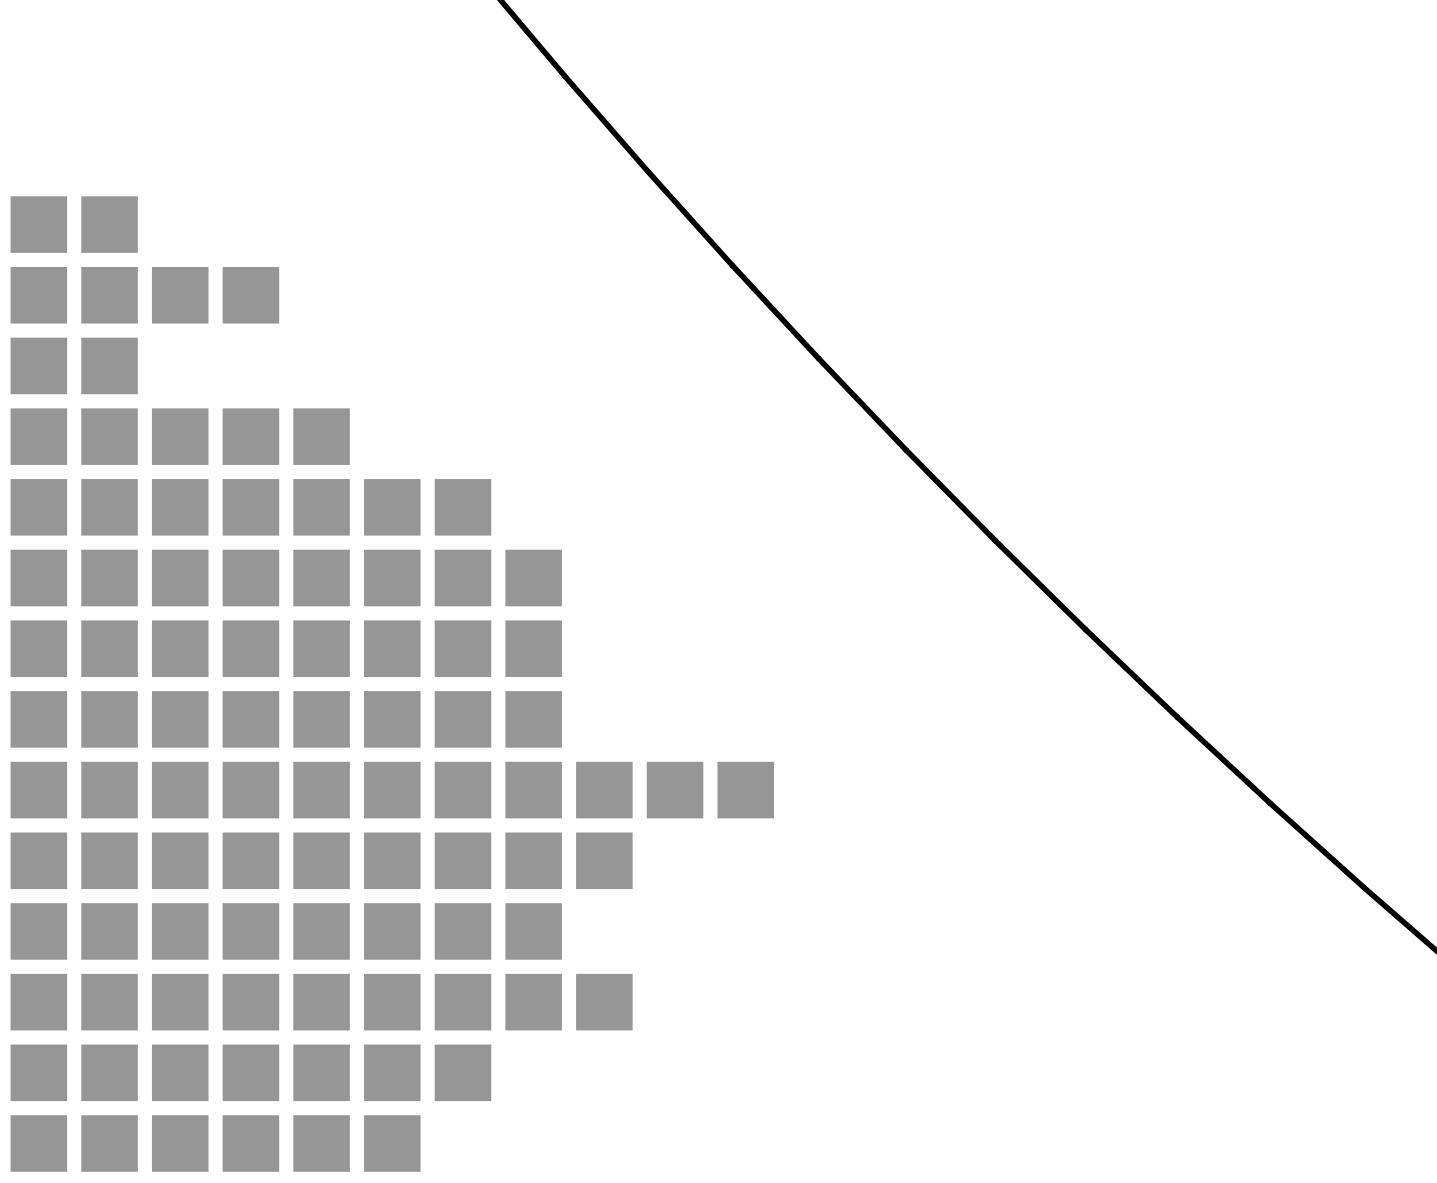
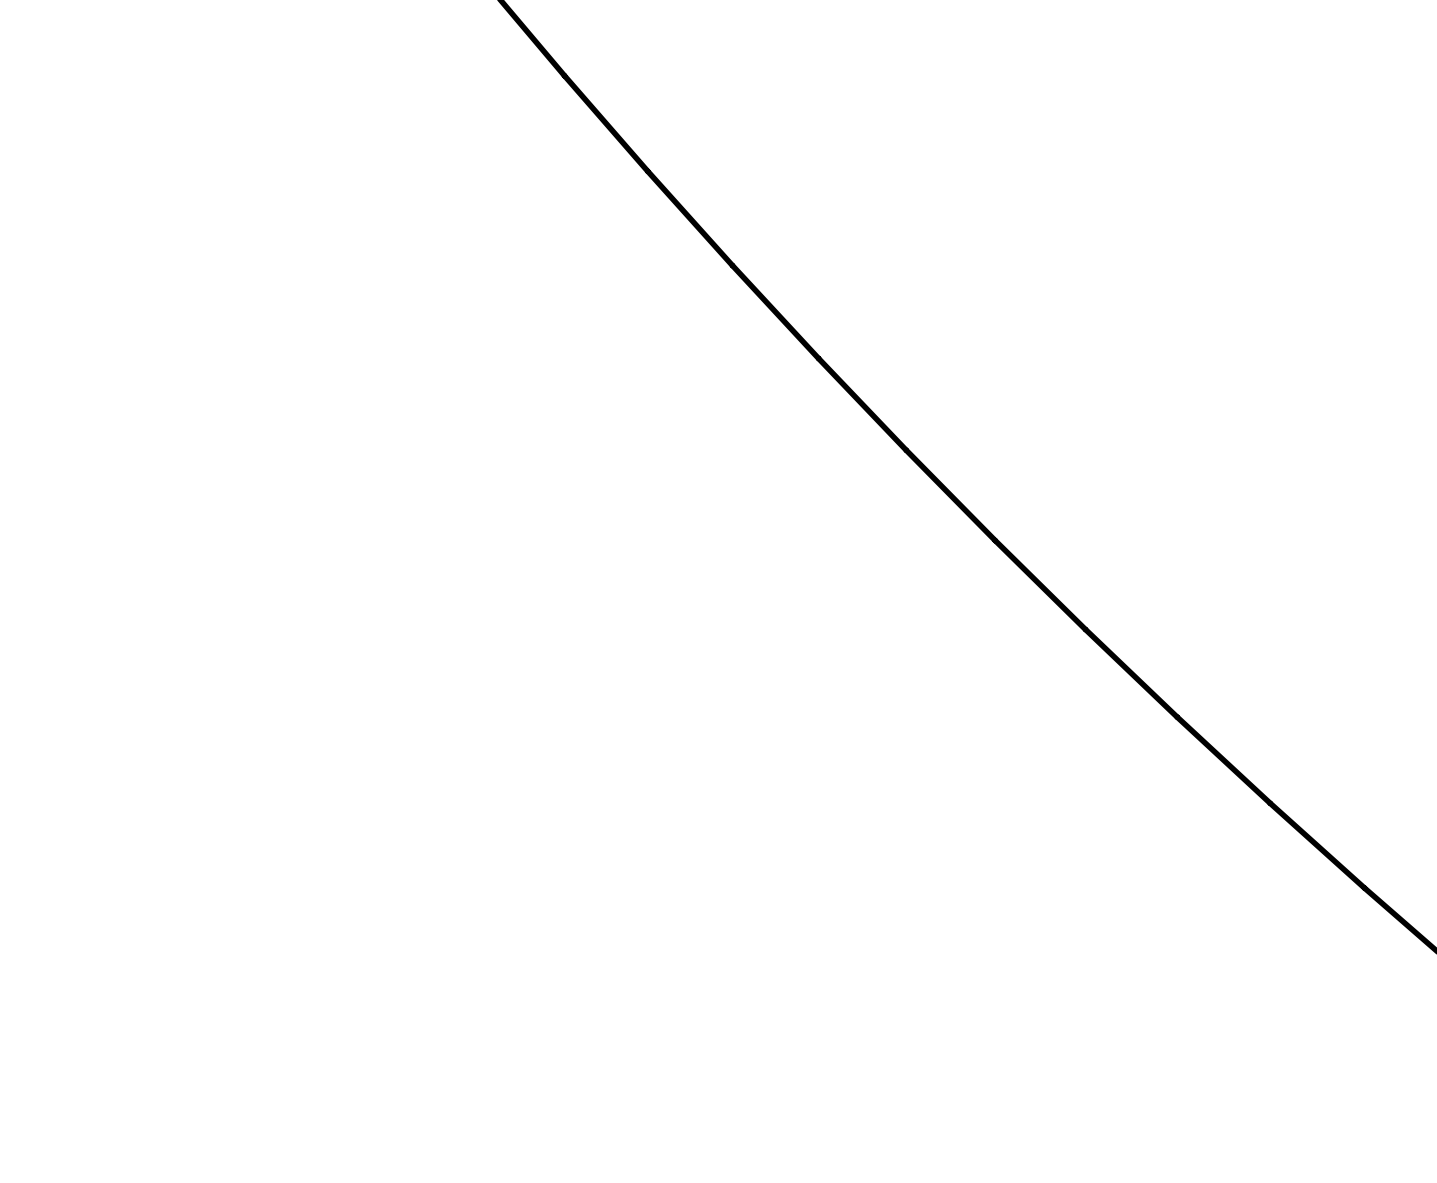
part: (38, 224) -> none
part: (109, 224) -> none
part: (38, 295) -> none
part: (109, 295) -> none
part: (180, 295) -> none
part: (250, 295) -> none
part: (38, 365) -> none
part: (109, 365) -> none
part: (38, 436) -> none
part: (109, 436) -> none
part: (180, 436) -> none
part: (250, 436) -> none
part: (321, 436) -> none
part: (38, 507) -> none
part: (109, 507) -> none
part: (180, 507) -> none
part: (250, 507) -> none
part: (321, 507) -> none
part: (392, 507) -> none
part: (462, 507) -> none
part: (38, 578) -> none
part: (109, 578) -> none
part: (180, 578) -> none
part: (250, 578) -> none
part: (321, 578) -> none
part: (392, 578) -> none
part: (462, 578) -> none
part: (533, 578) -> none
part: (38, 648) -> none
part: (109, 648) -> none
part: (180, 648) -> none
part: (250, 648) -> none
part: (321, 648) -> none
part: (392, 648) -> none
part: (462, 648) -> none
part: (533, 648) -> none
part: (38, 719) -> none
part: (109, 719) -> none
part: (180, 719) -> none
part: (250, 719) -> none
part: (321, 719) -> none
part: (392, 719) -> none
part: (462, 719) -> none
part: (533, 719) -> none
part: (38, 790) -> none
part: (109, 790) -> none
part: (180, 790) -> none
part: (250, 790) -> none
part: (321, 790) -> none
part: (392, 790) -> none
part: (462, 790) -> none
part: (533, 790) -> none
part: (604, 790) -> none
part: (675, 790) -> none
part: (745, 790) -> none
part: (38, 860) -> none
part: (109, 860) -> none
part: (180, 860) -> none
part: (250, 860) -> none
part: (321, 860) -> none
part: (392, 860) -> none
part: (462, 860) -> none
part: (533, 860) -> none
part: (604, 860) -> none
part: (38, 931) -> none
part: (109, 931) -> none
part: (180, 931) -> none
part: (250, 931) -> none
part: (321, 931) -> none
part: (392, 931) -> none
part: (462, 931) -> none
part: (533, 931) -> none
part: (38, 1002) -> none
part: (109, 1002) -> none
part: (180, 1002) -> none
part: (250, 1002) -> none
part: (321, 1002) -> none
part: (392, 1002) -> none
part: (462, 1002) -> none
part: (533, 1002) -> none
part: (604, 1002) -> none
part: (38, 1072) -> none
part: (109, 1072) -> none
part: (180, 1072) -> none
part: (250, 1072) -> none
part: (321, 1072) -> none
part: (392, 1072) -> none
part: (462, 1072) -> none
part: (38, 1143) -> none
part: (109, 1143) -> none
part: (180, 1143) -> none
part: (250, 1143) -> none
part: (321, 1143) -> none
part: (392, 1143) -> none

